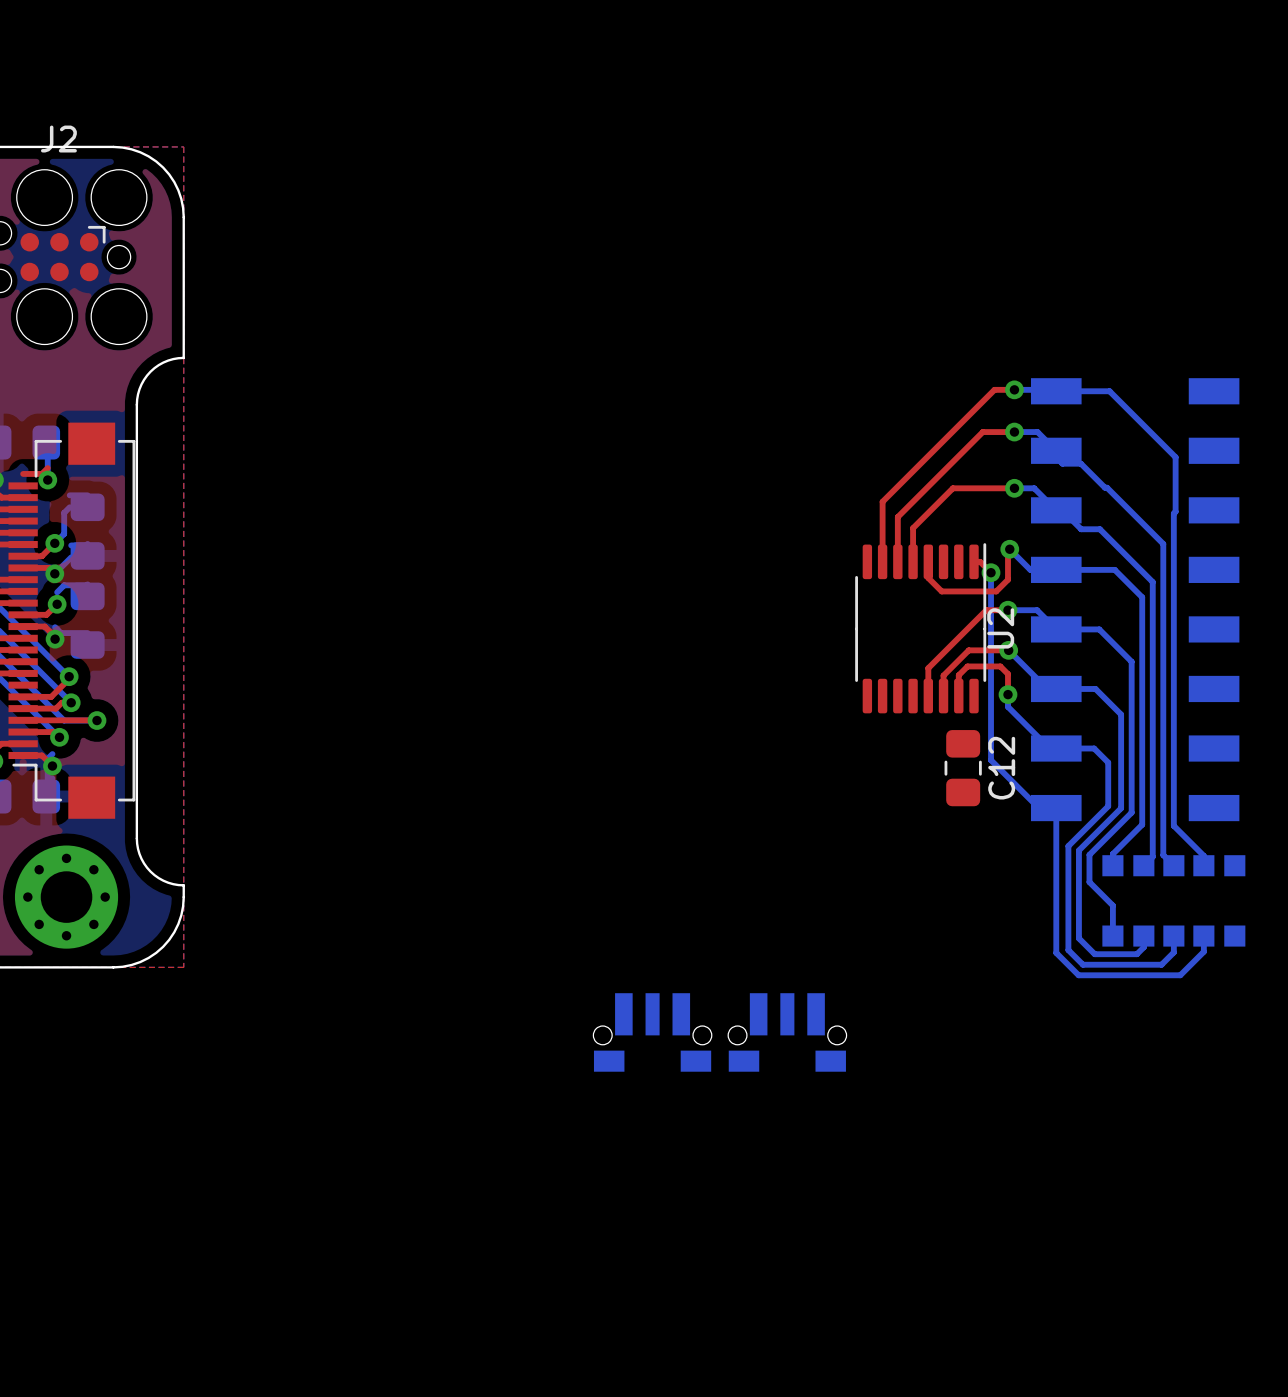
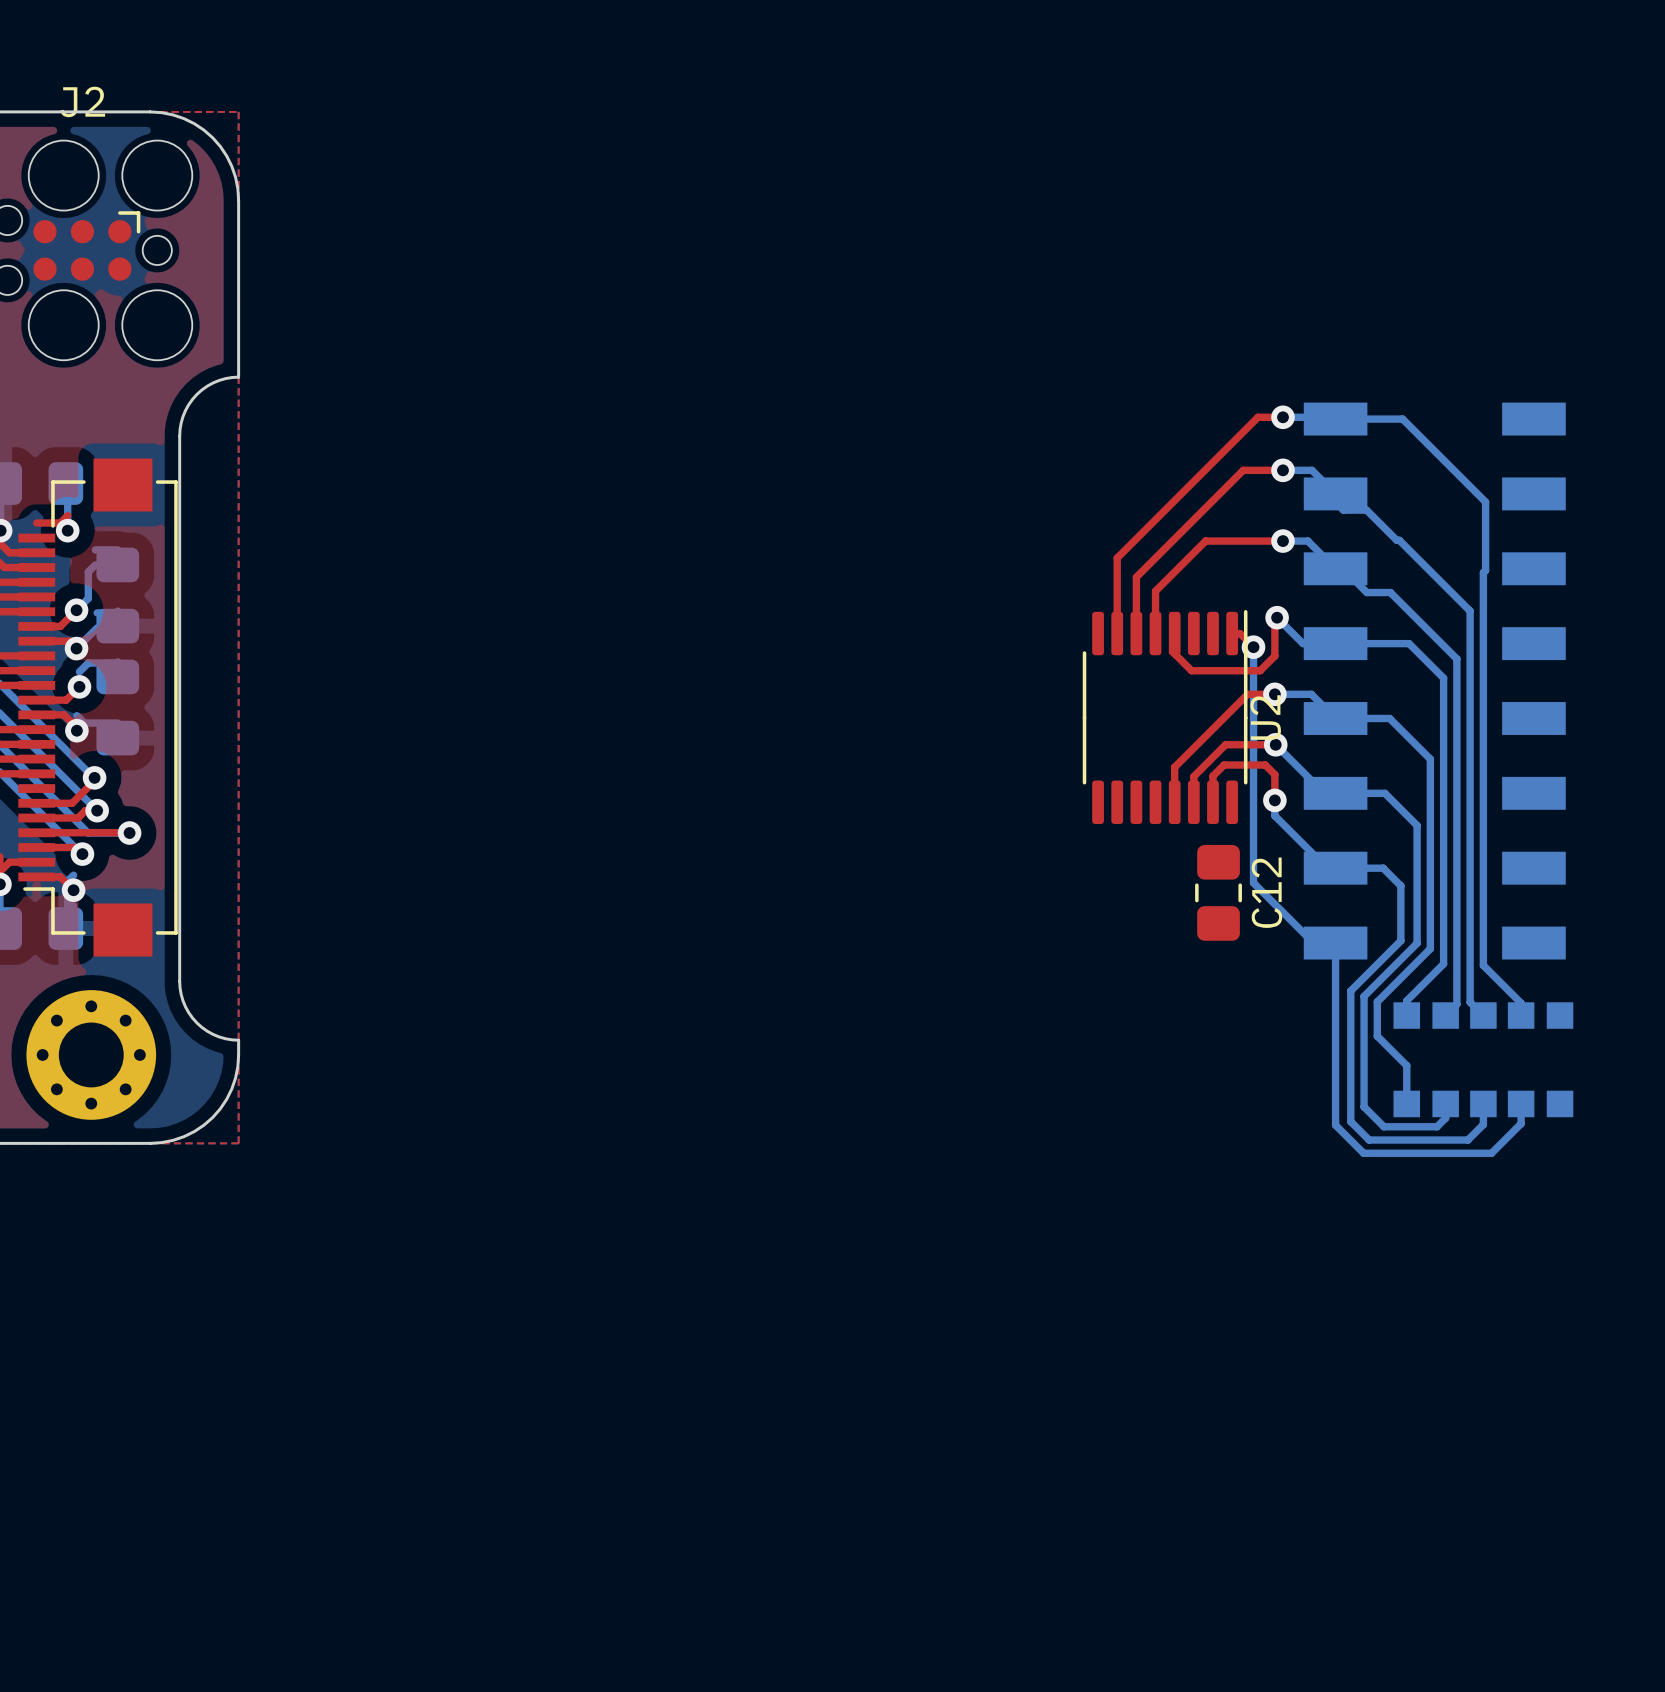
part: (652, 1032) -> none
part: (787, 1032) -> none

